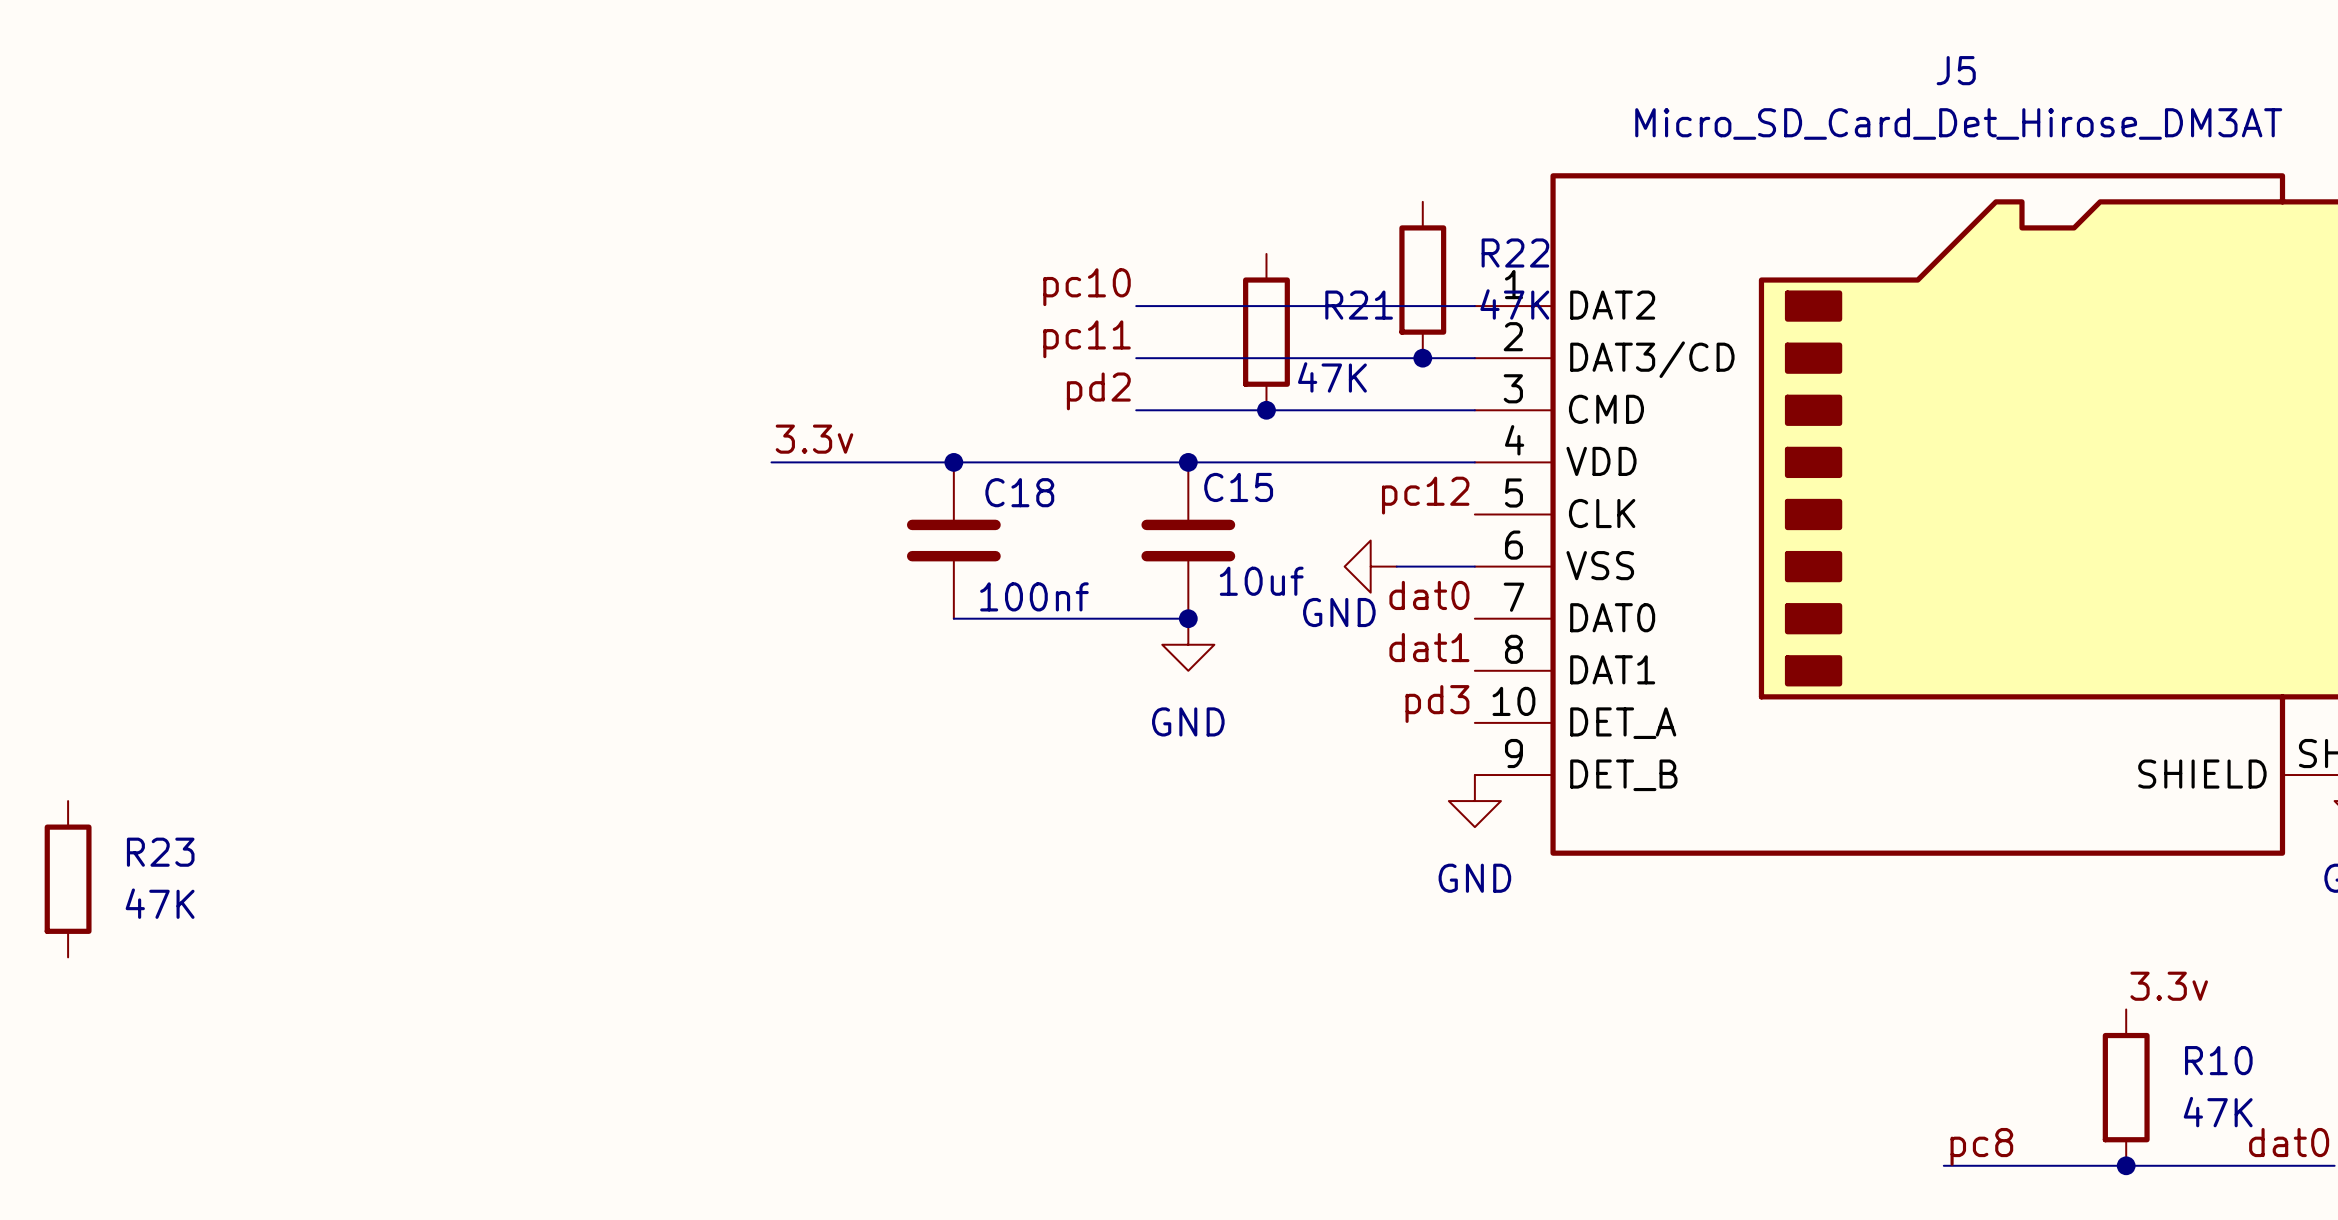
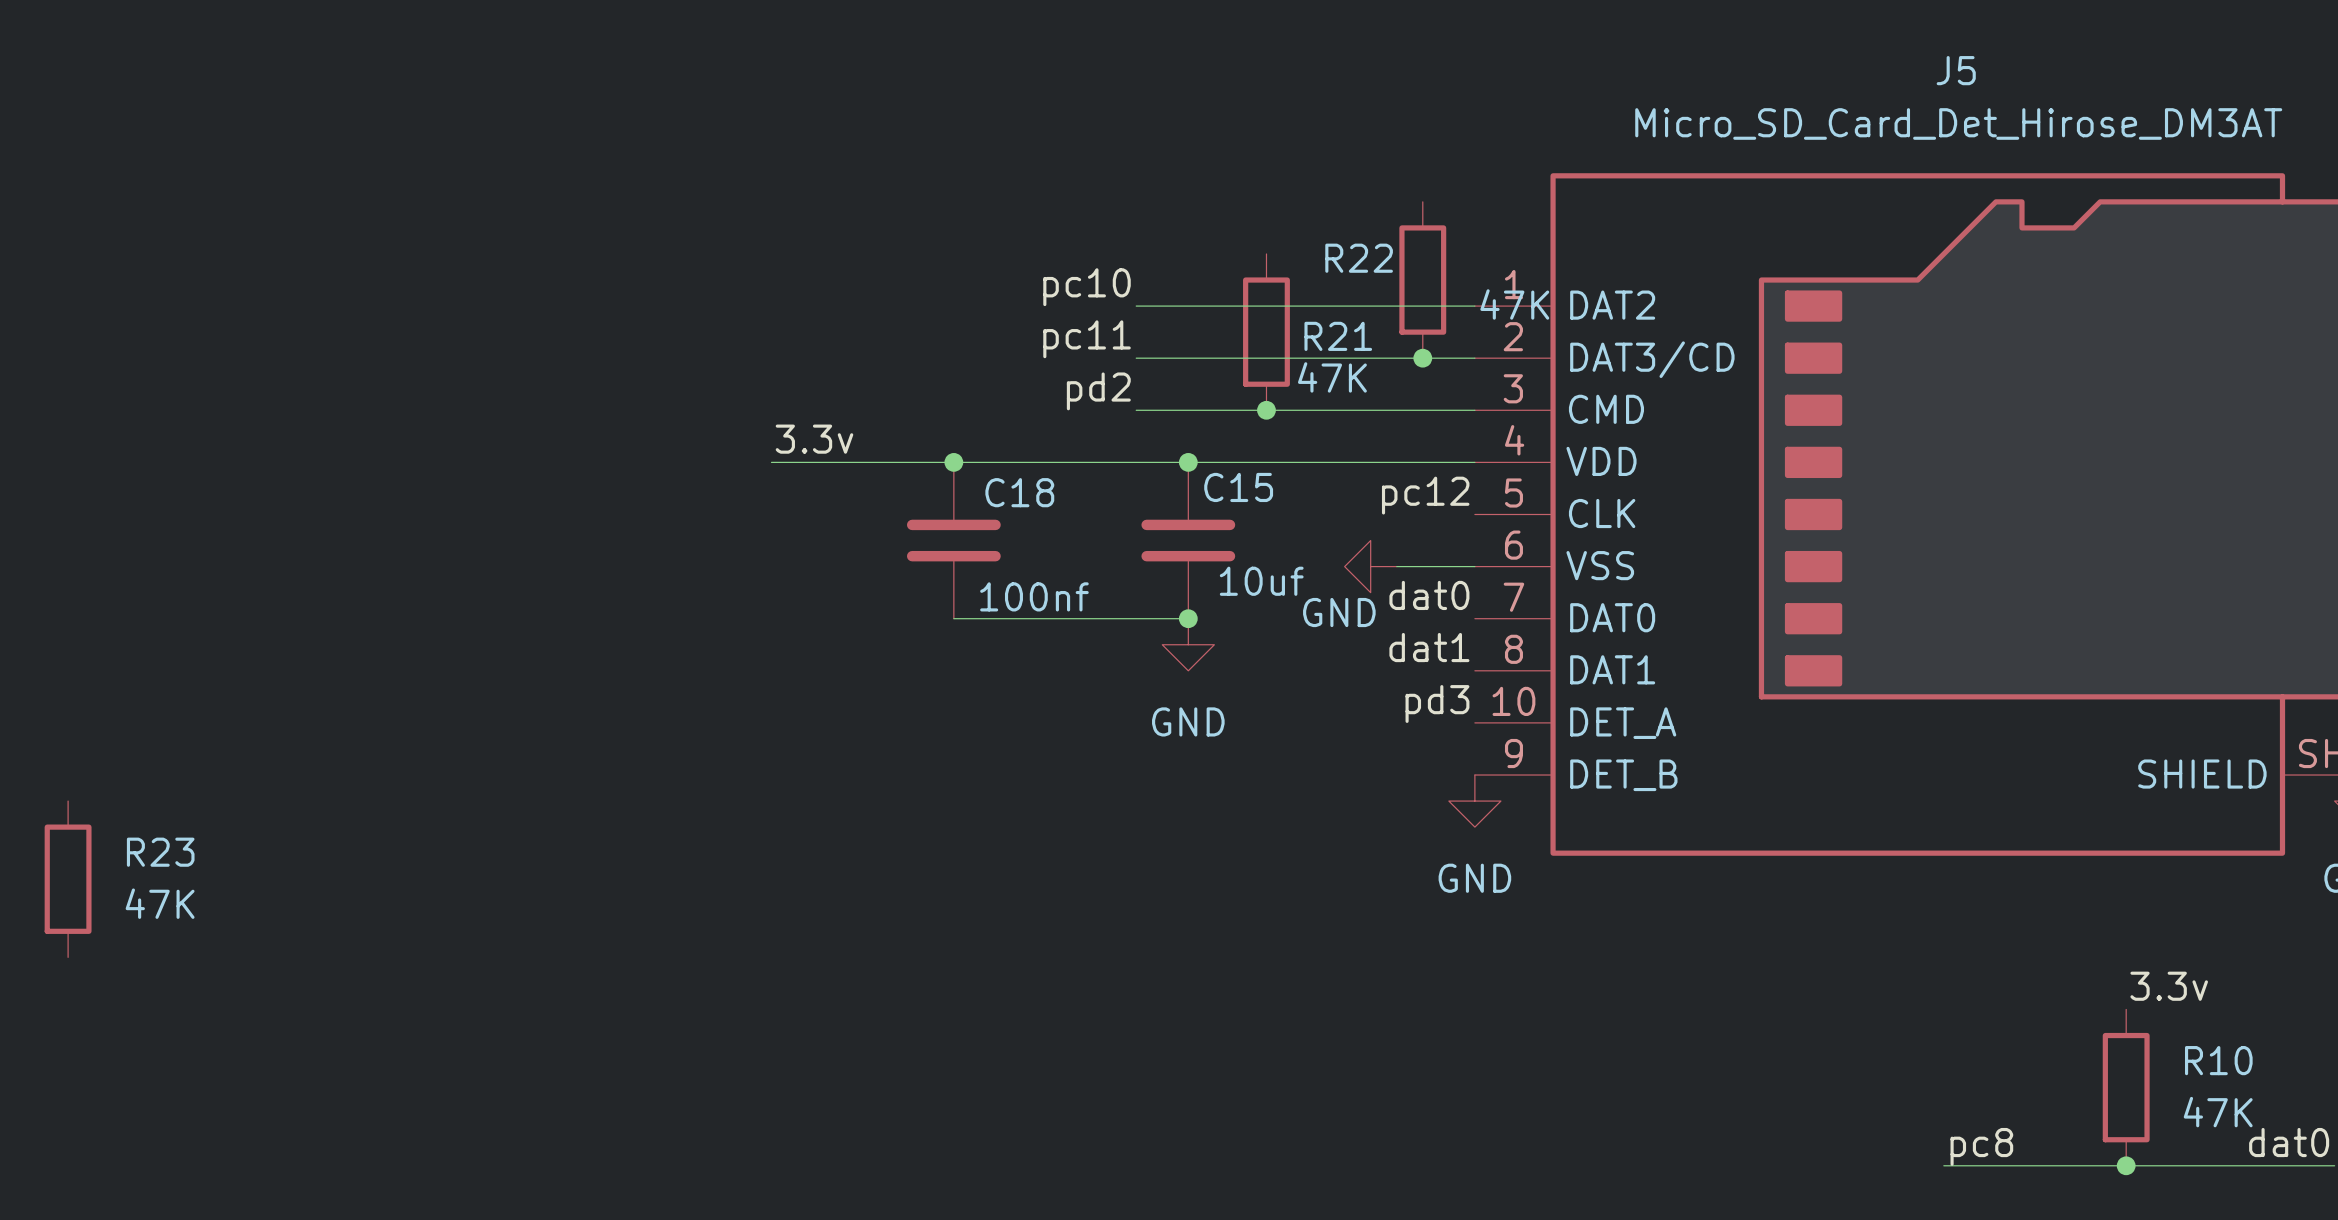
R22 name position: R22 (1515, 252) -> R22 (1359, 258)
R21 name position: R21 (1359, 305) -> R21 (1338, 336)

